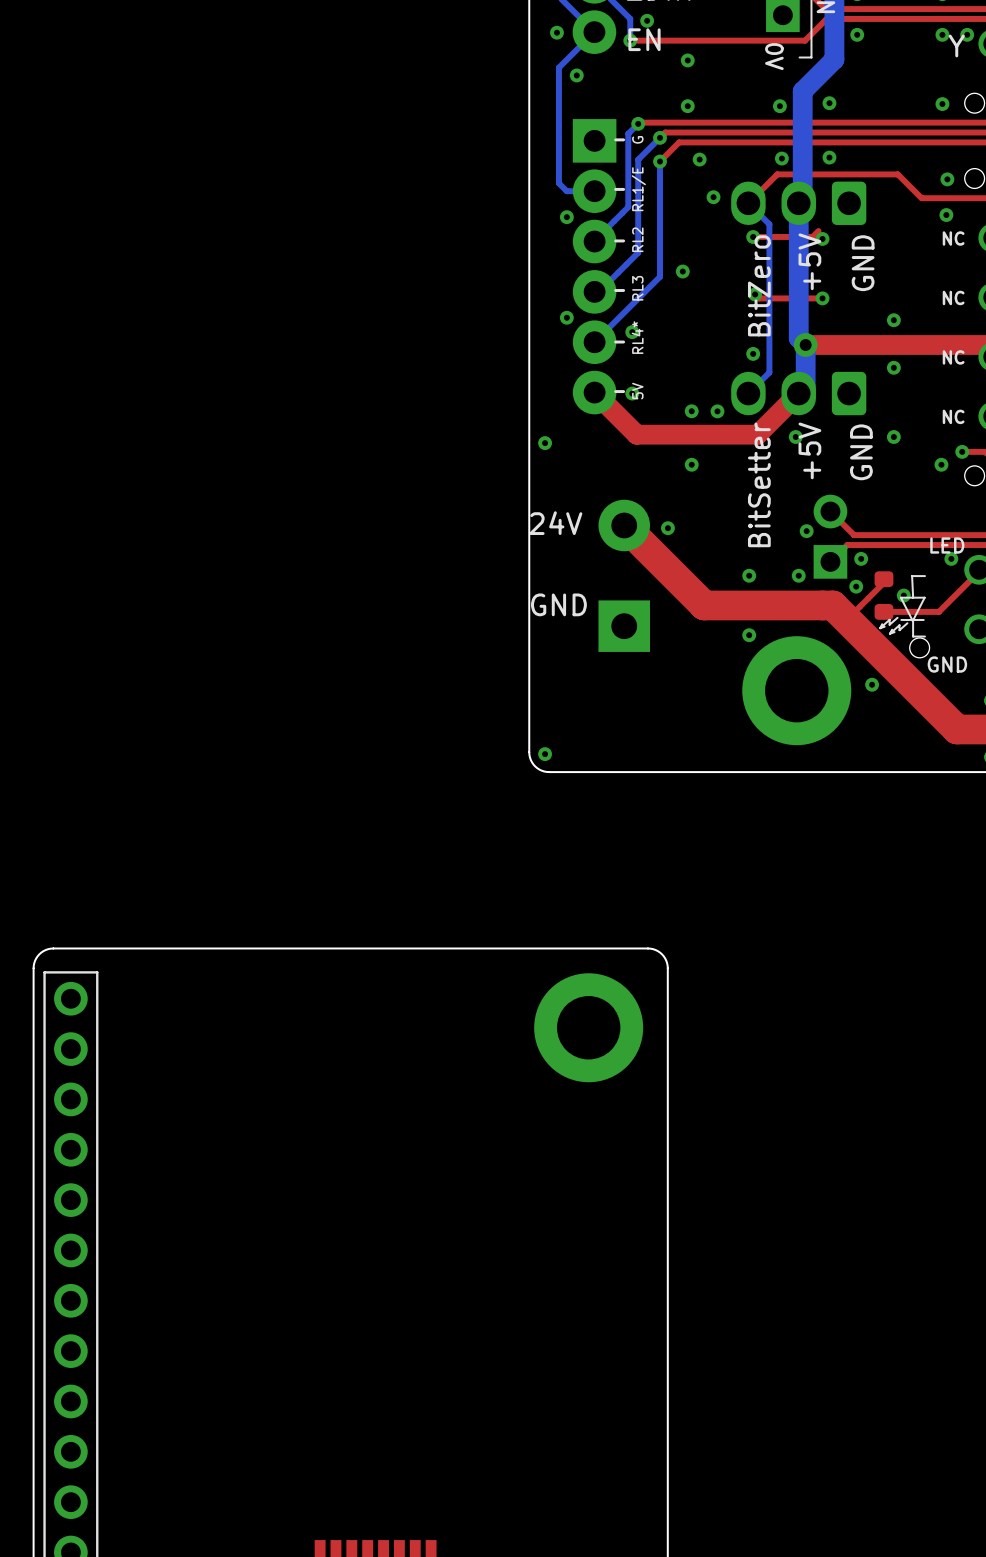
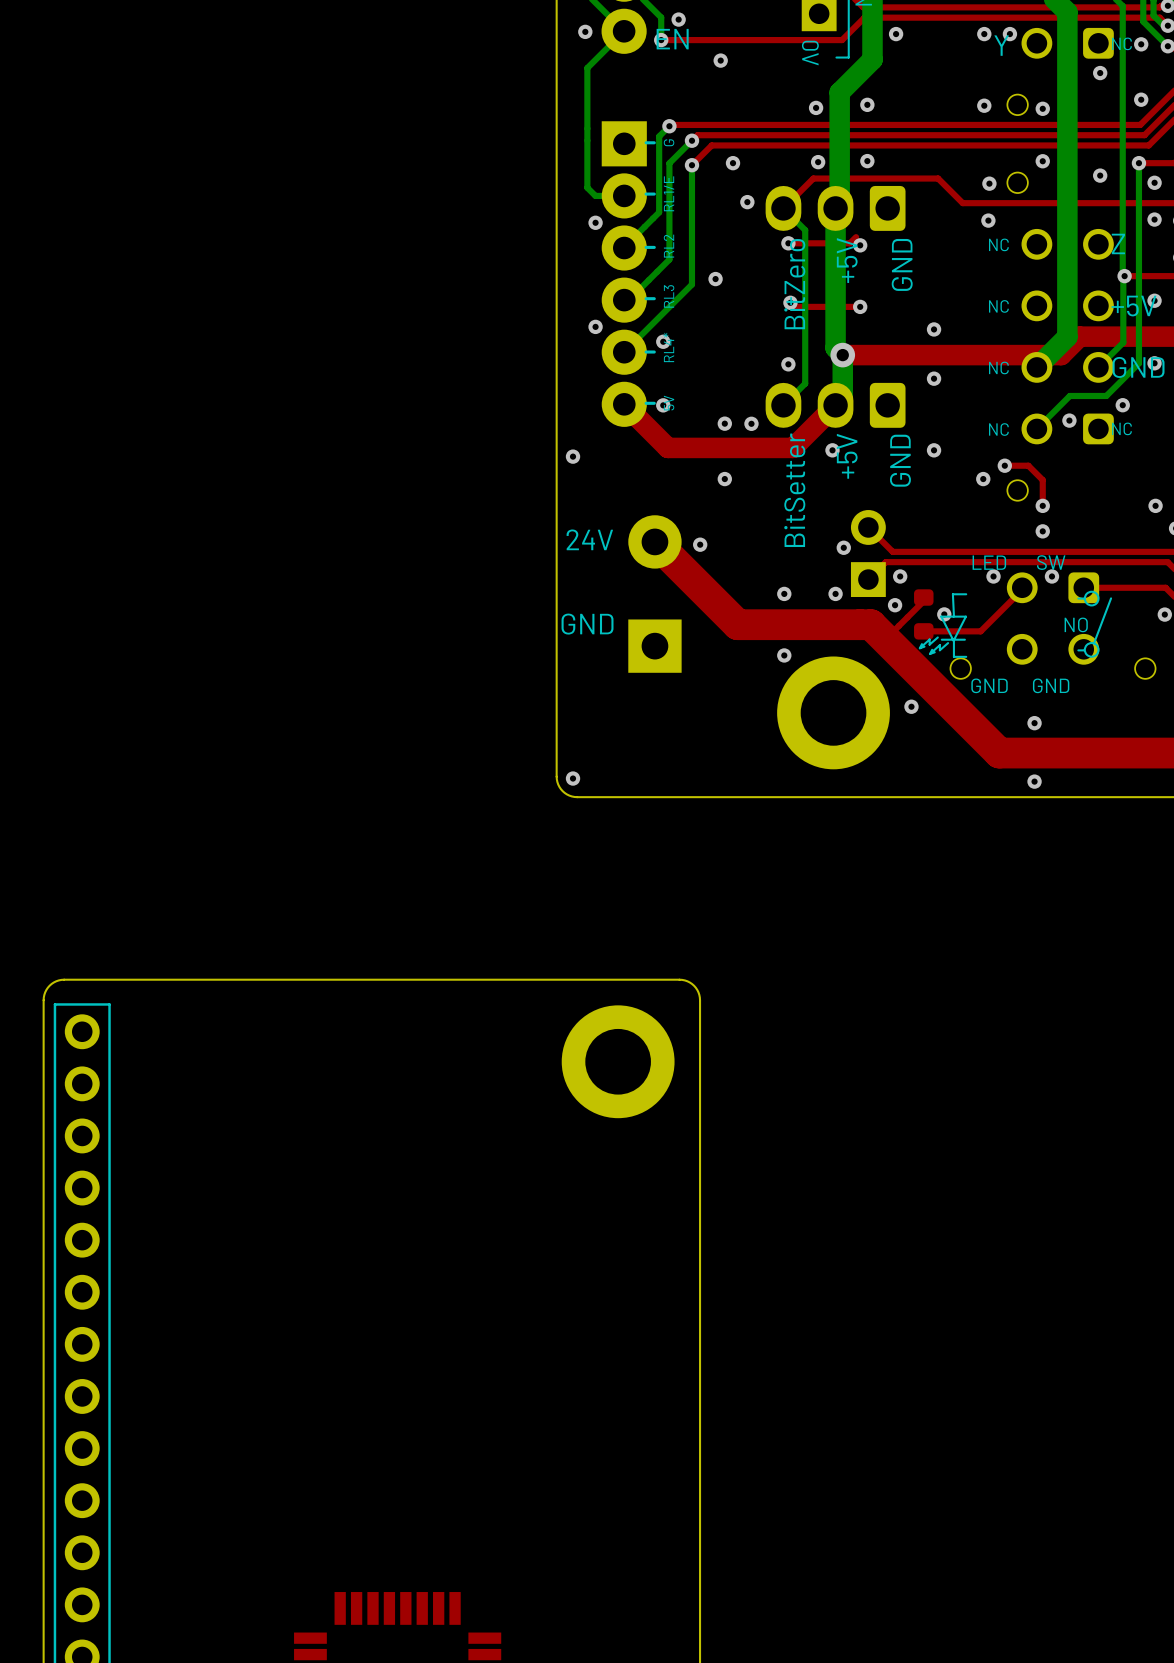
via: (576, 75) -> none
via: (687, 106) -> none

